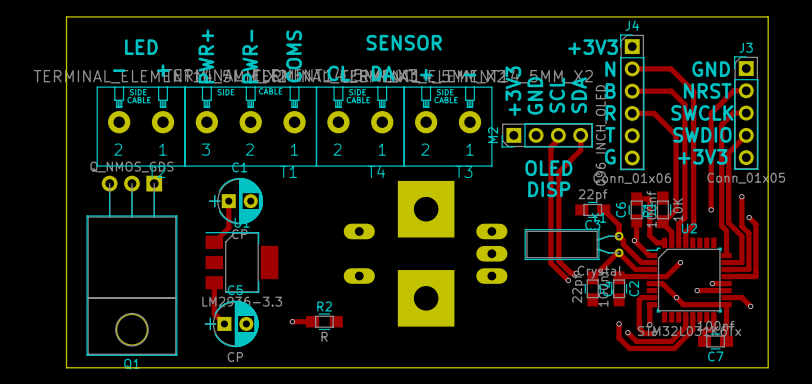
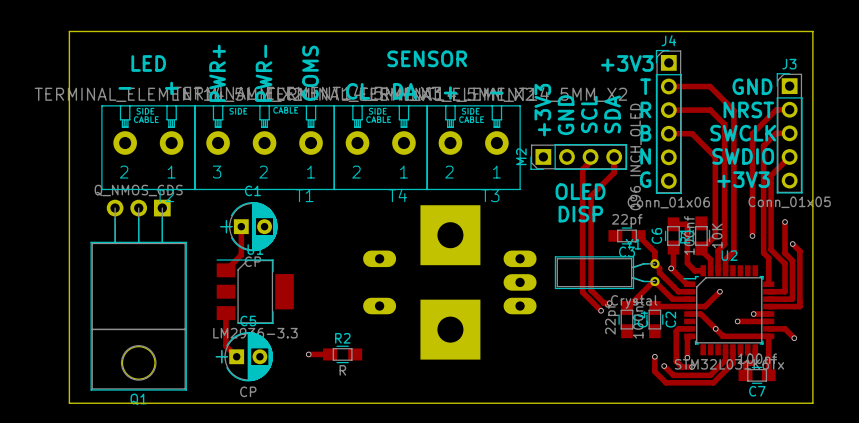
text: N (610, 69) -> T (645, 86)
text: B (610, 91) -> R (645, 109)
text: R (610, 112) -> B (645, 133)
text: T (610, 134) -> N (645, 156)

